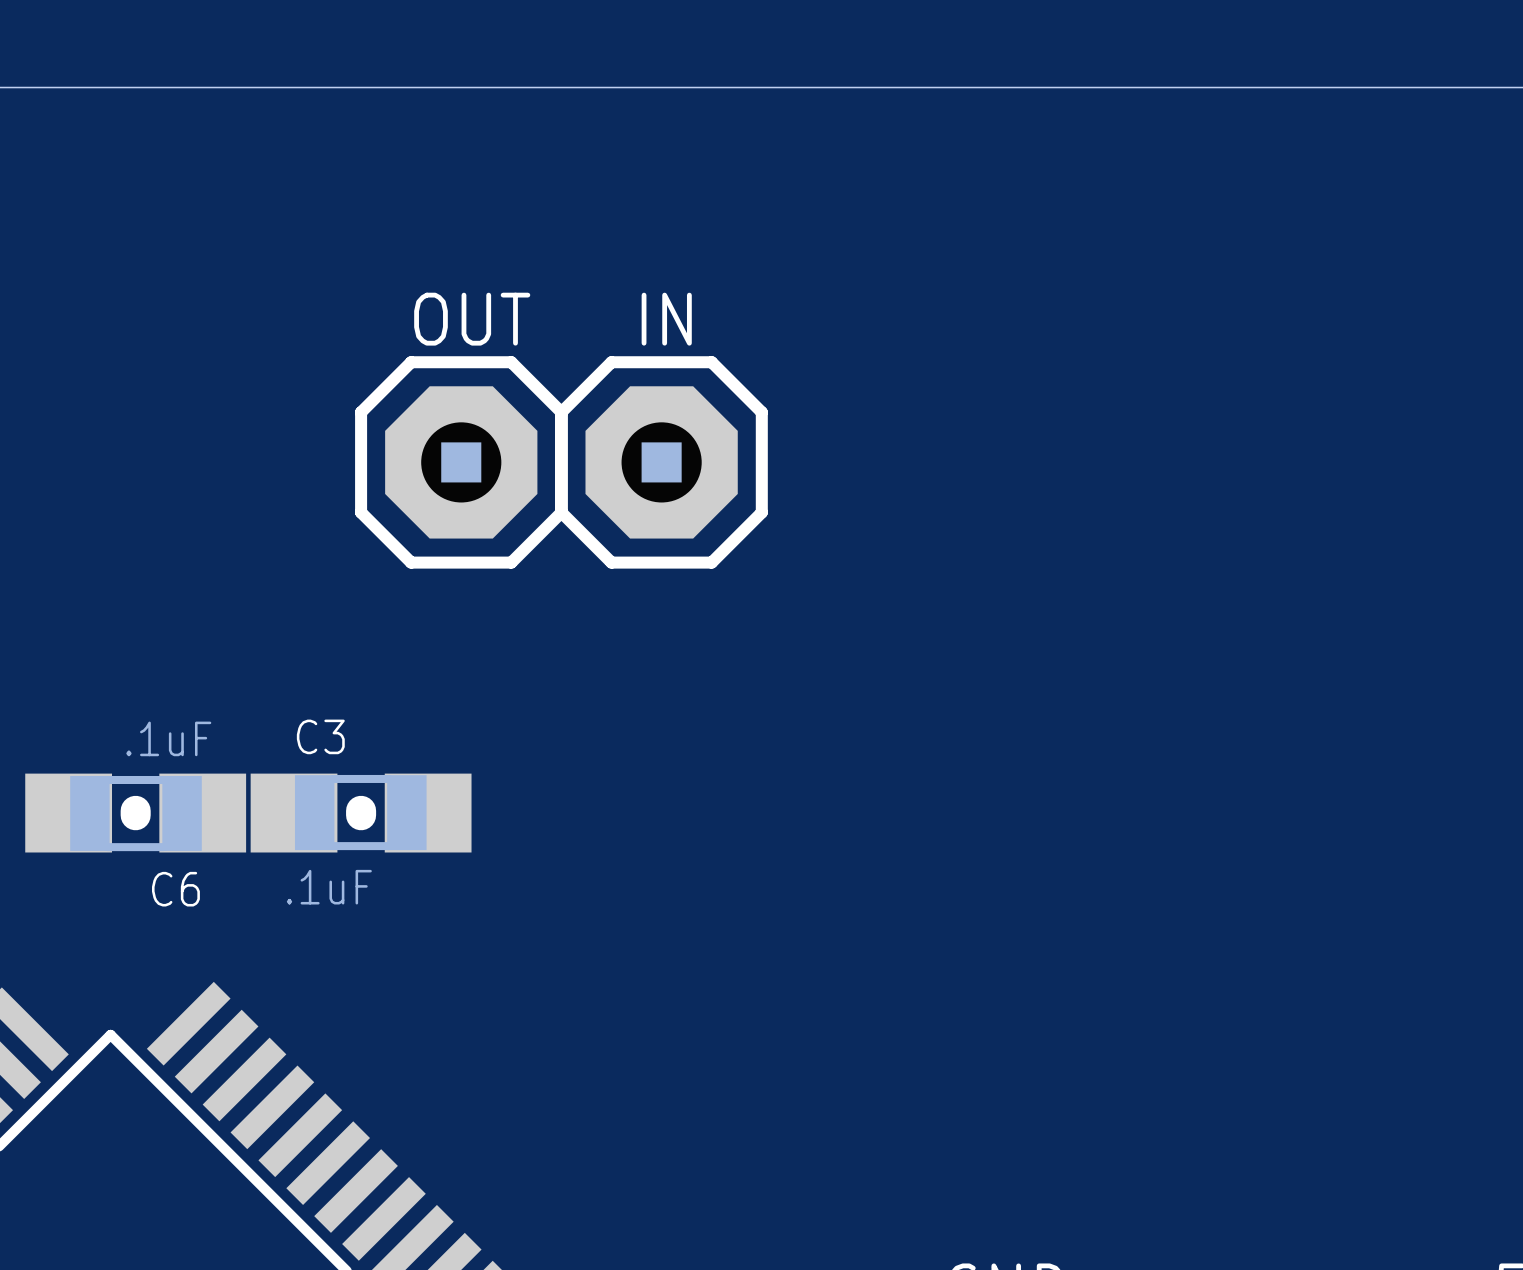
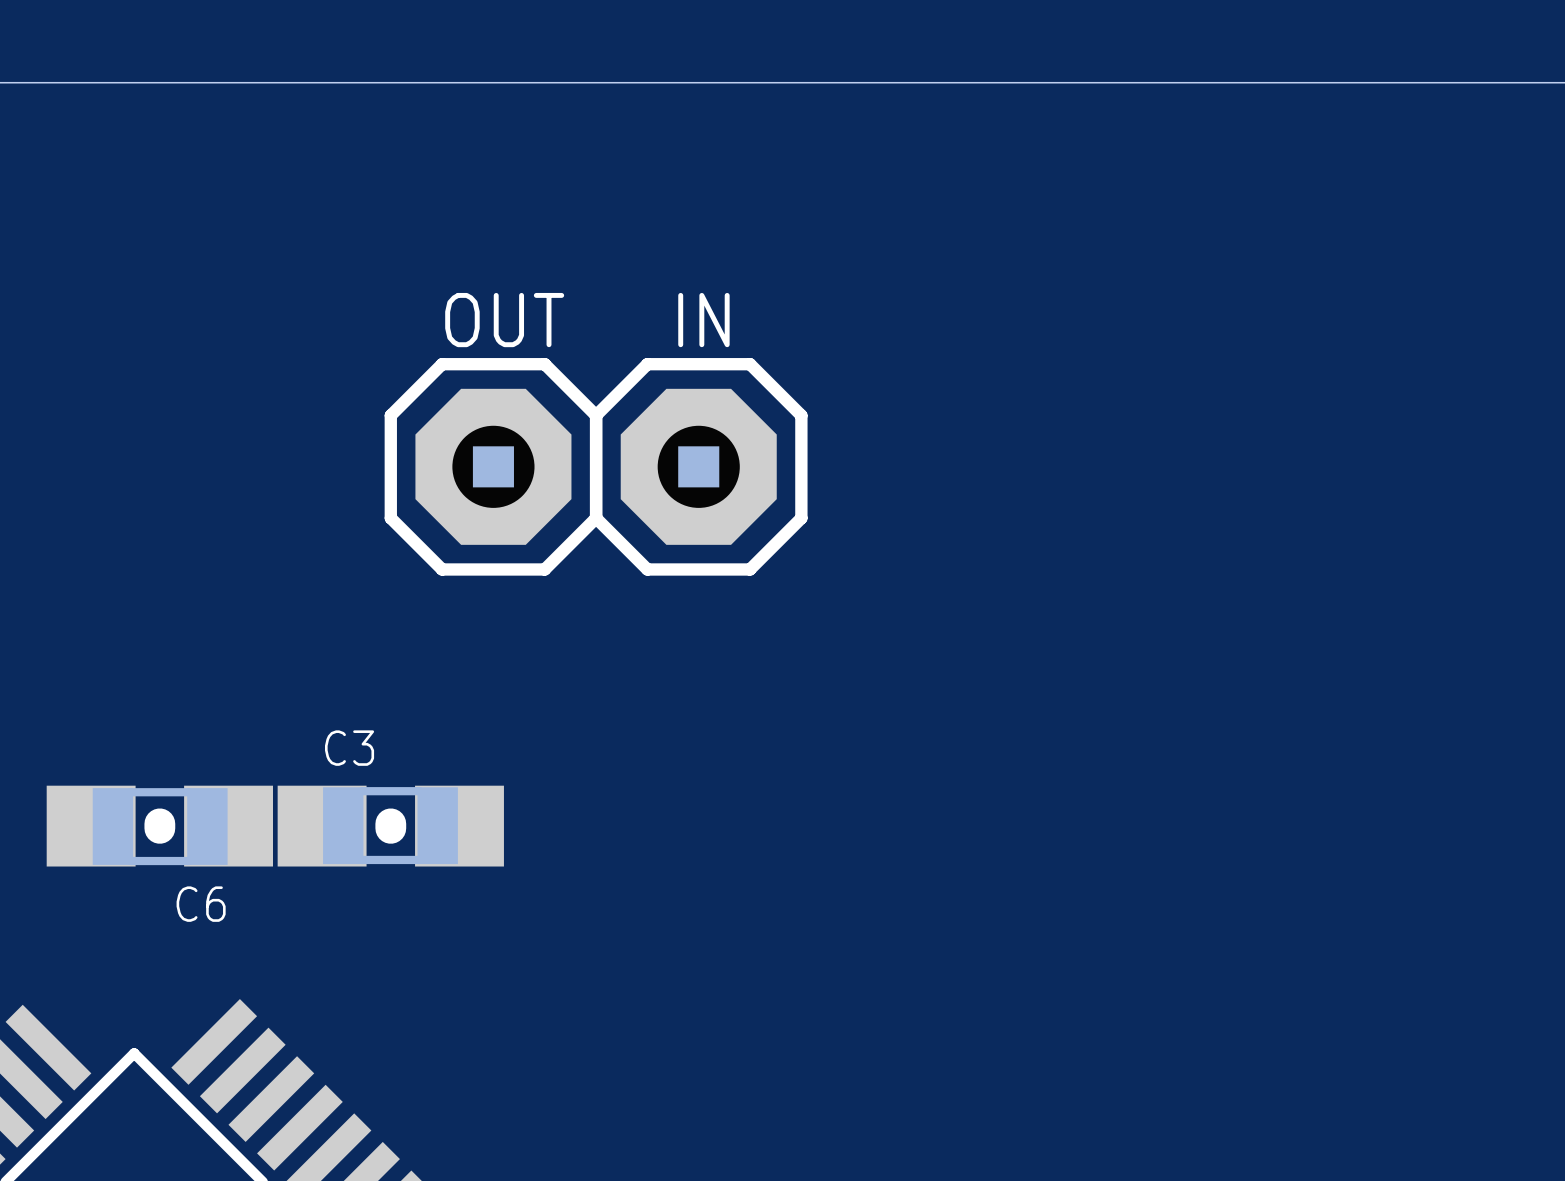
C6 value: .1uF (168, 738) -> none
C3 value: .1uF (329, 887) -> none

